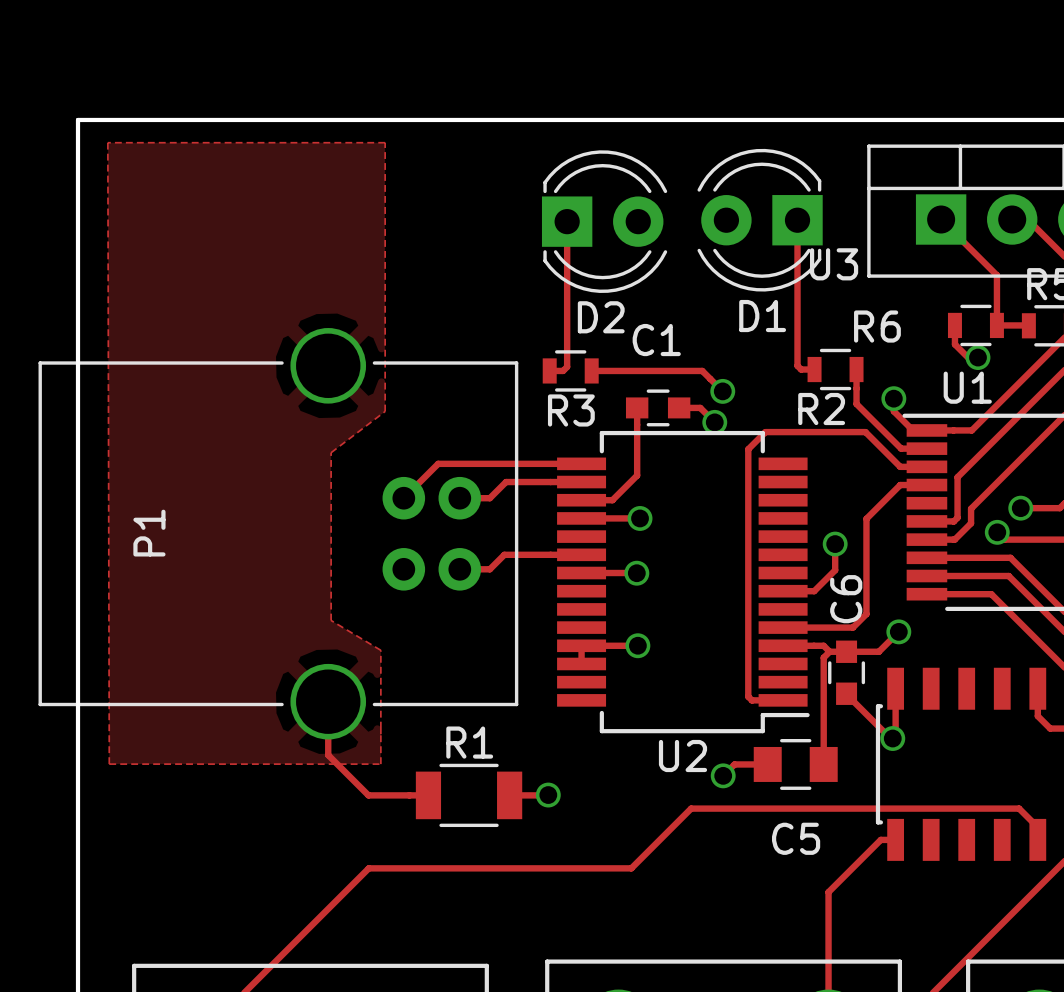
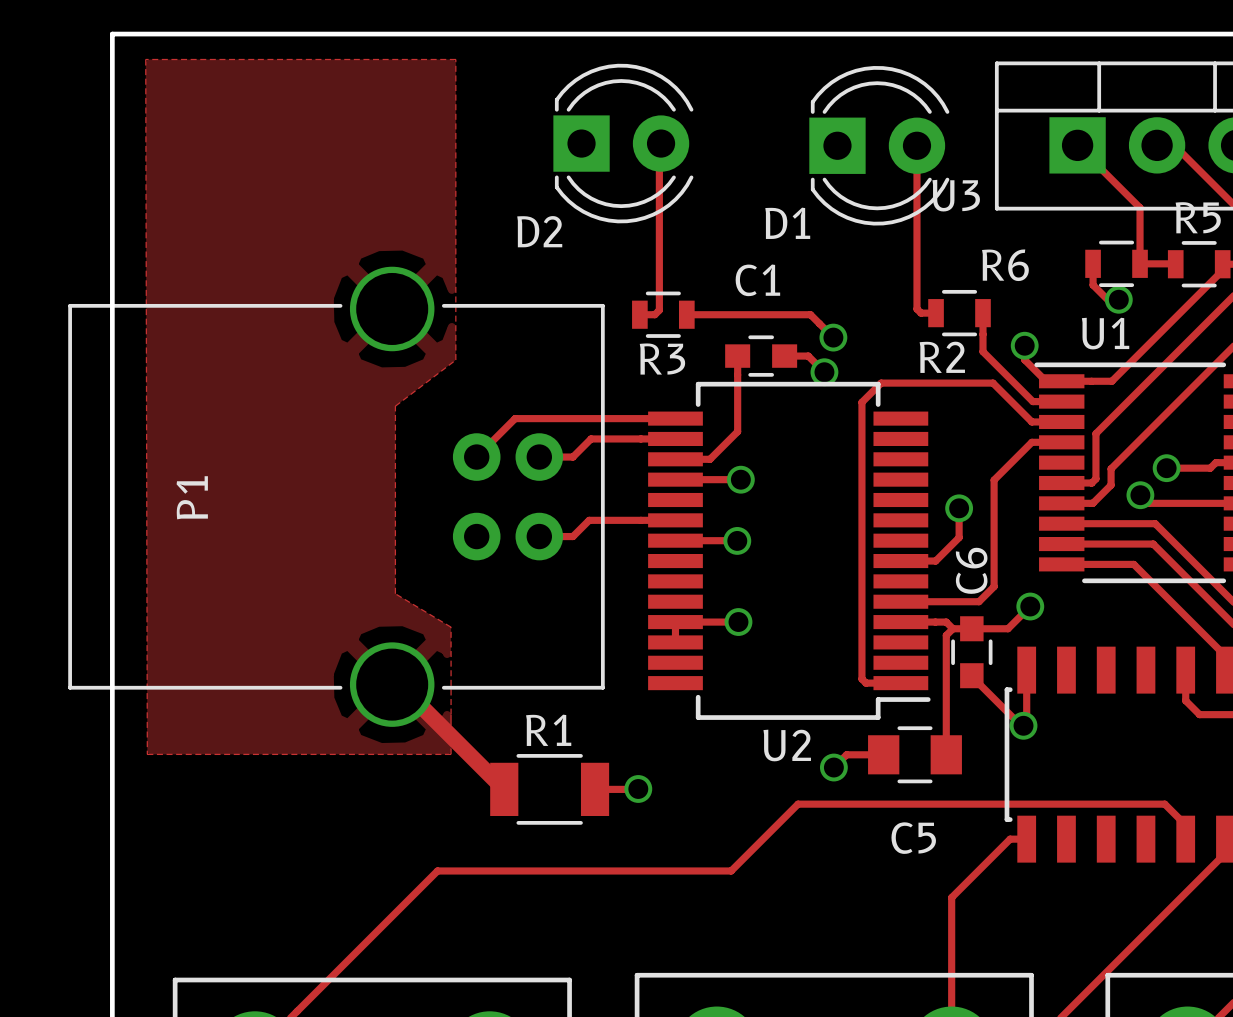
D1 rotation: 0° (760, 220) -> 180° (879, 145)
D2 position: (604, 221) -> (623, 143)
D1 name position: D1 (762, 316) -> D1 (787, 223)
D2 name position: D2 (601, 317) -> D2 (539, 231)
track: (328, 701) (328, 755) (368, 795) (428, 795) -> (392, 684) (399, 684) (504, 789)

